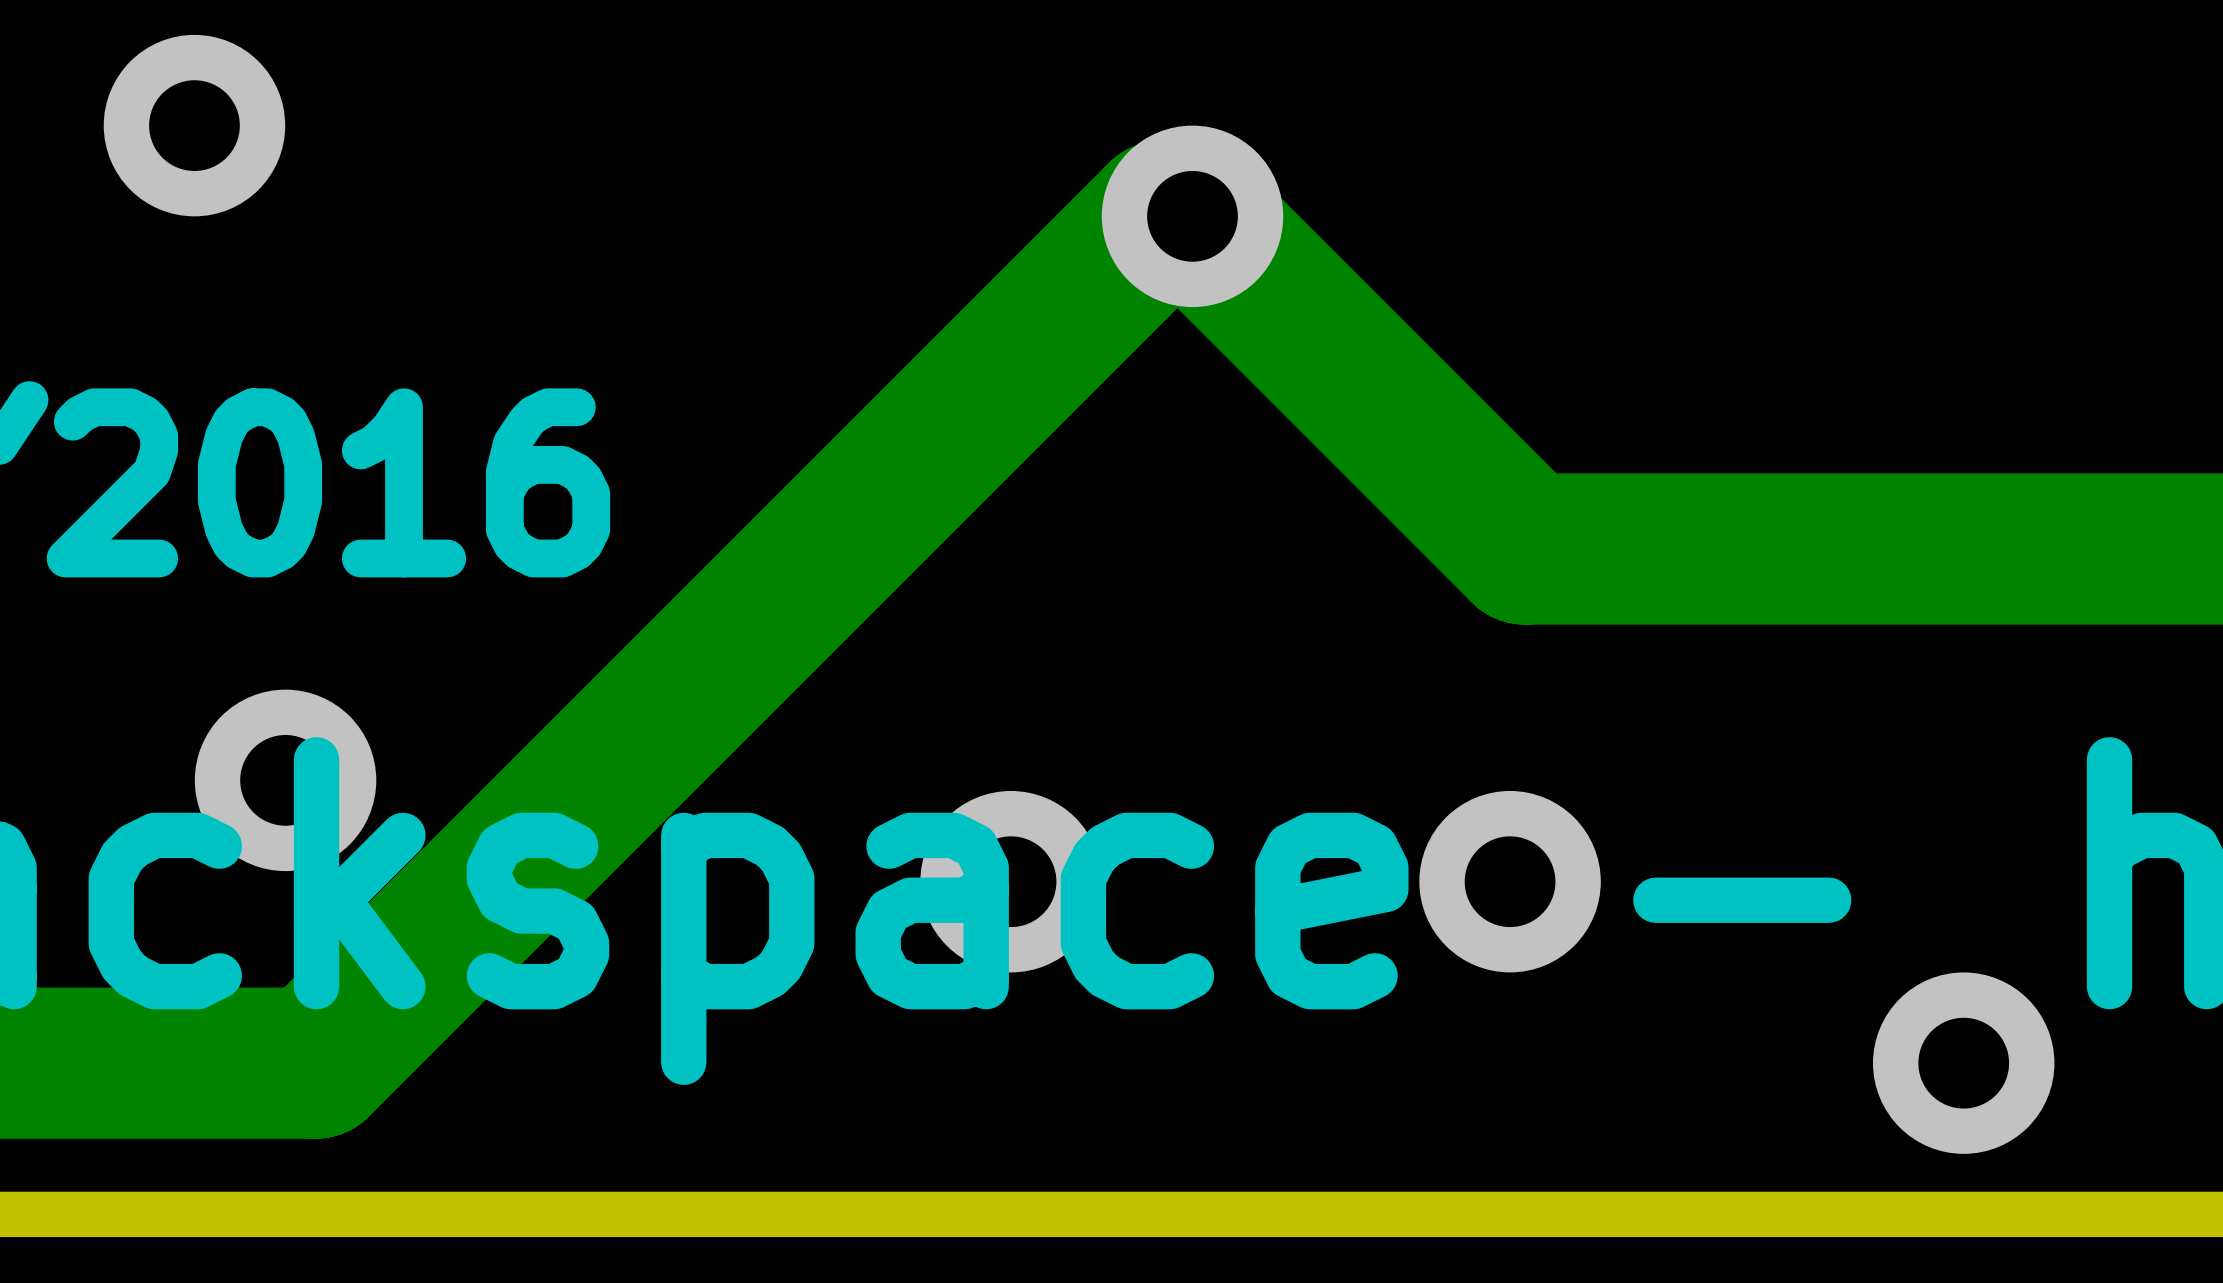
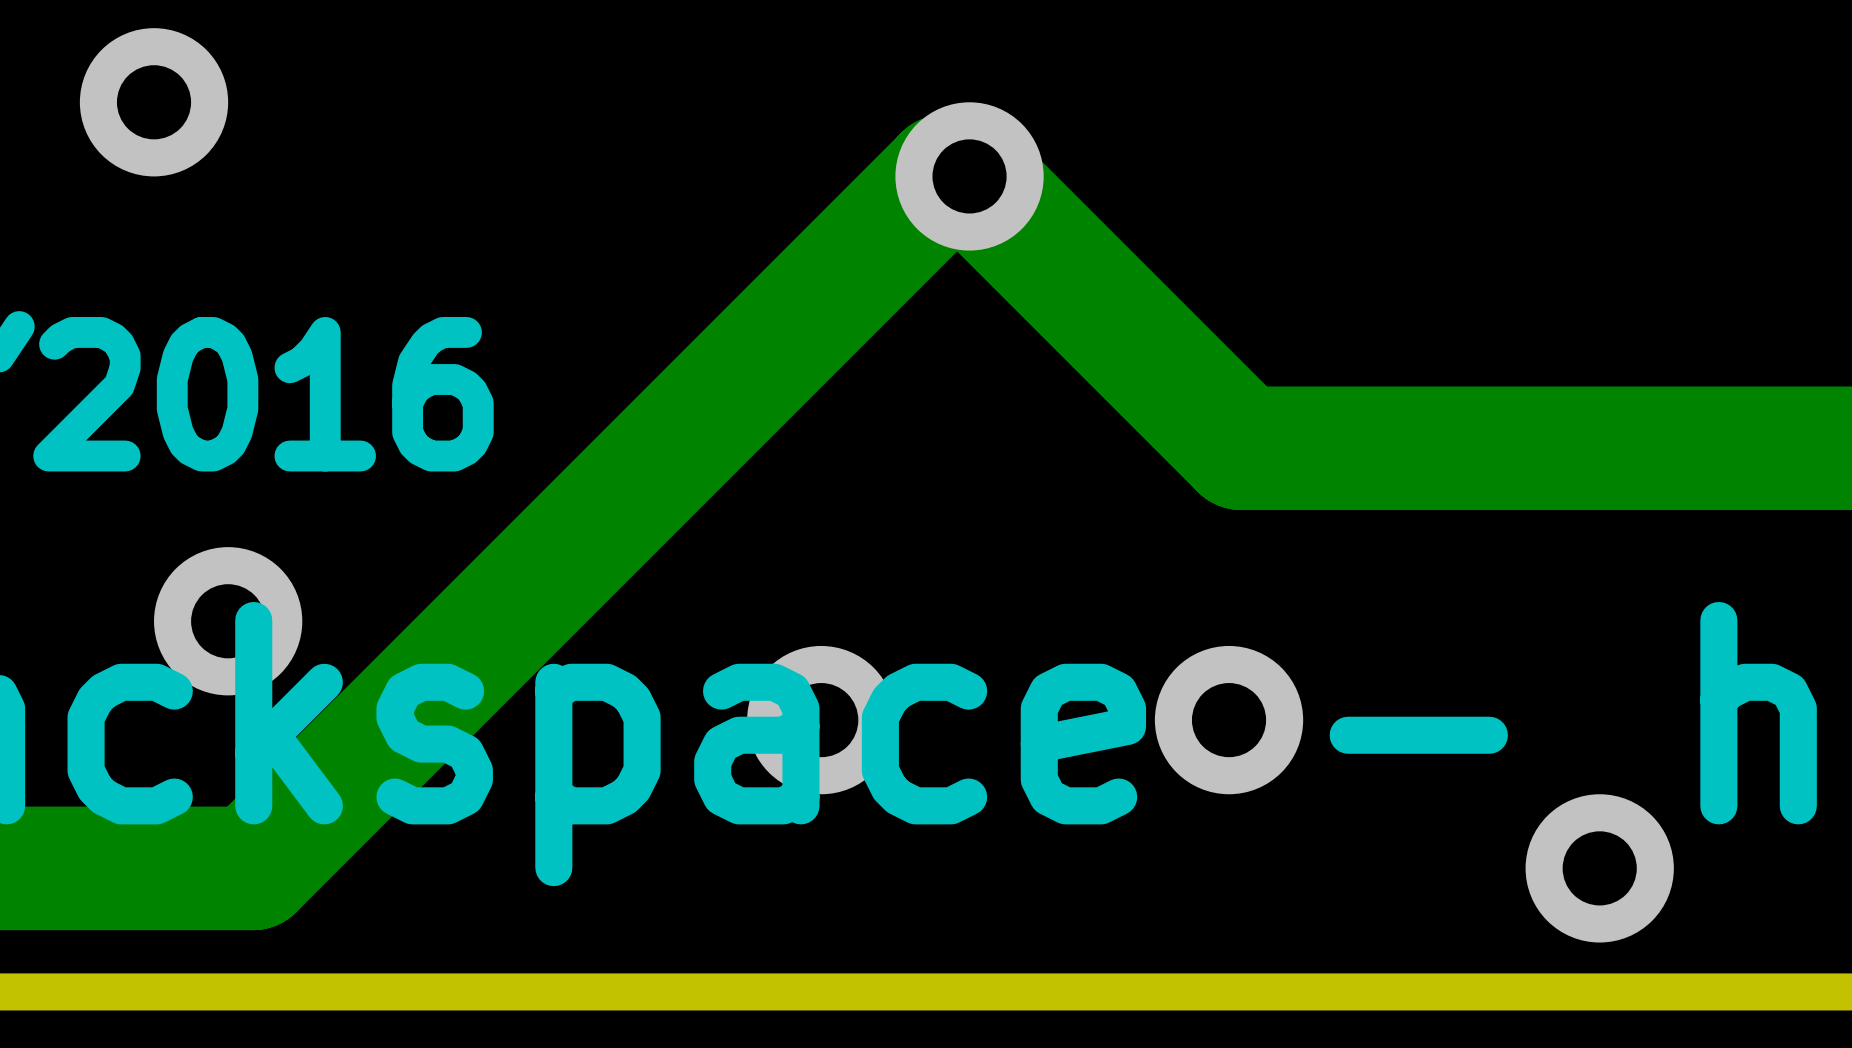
via position: (285, 780) -> (228, 621)

